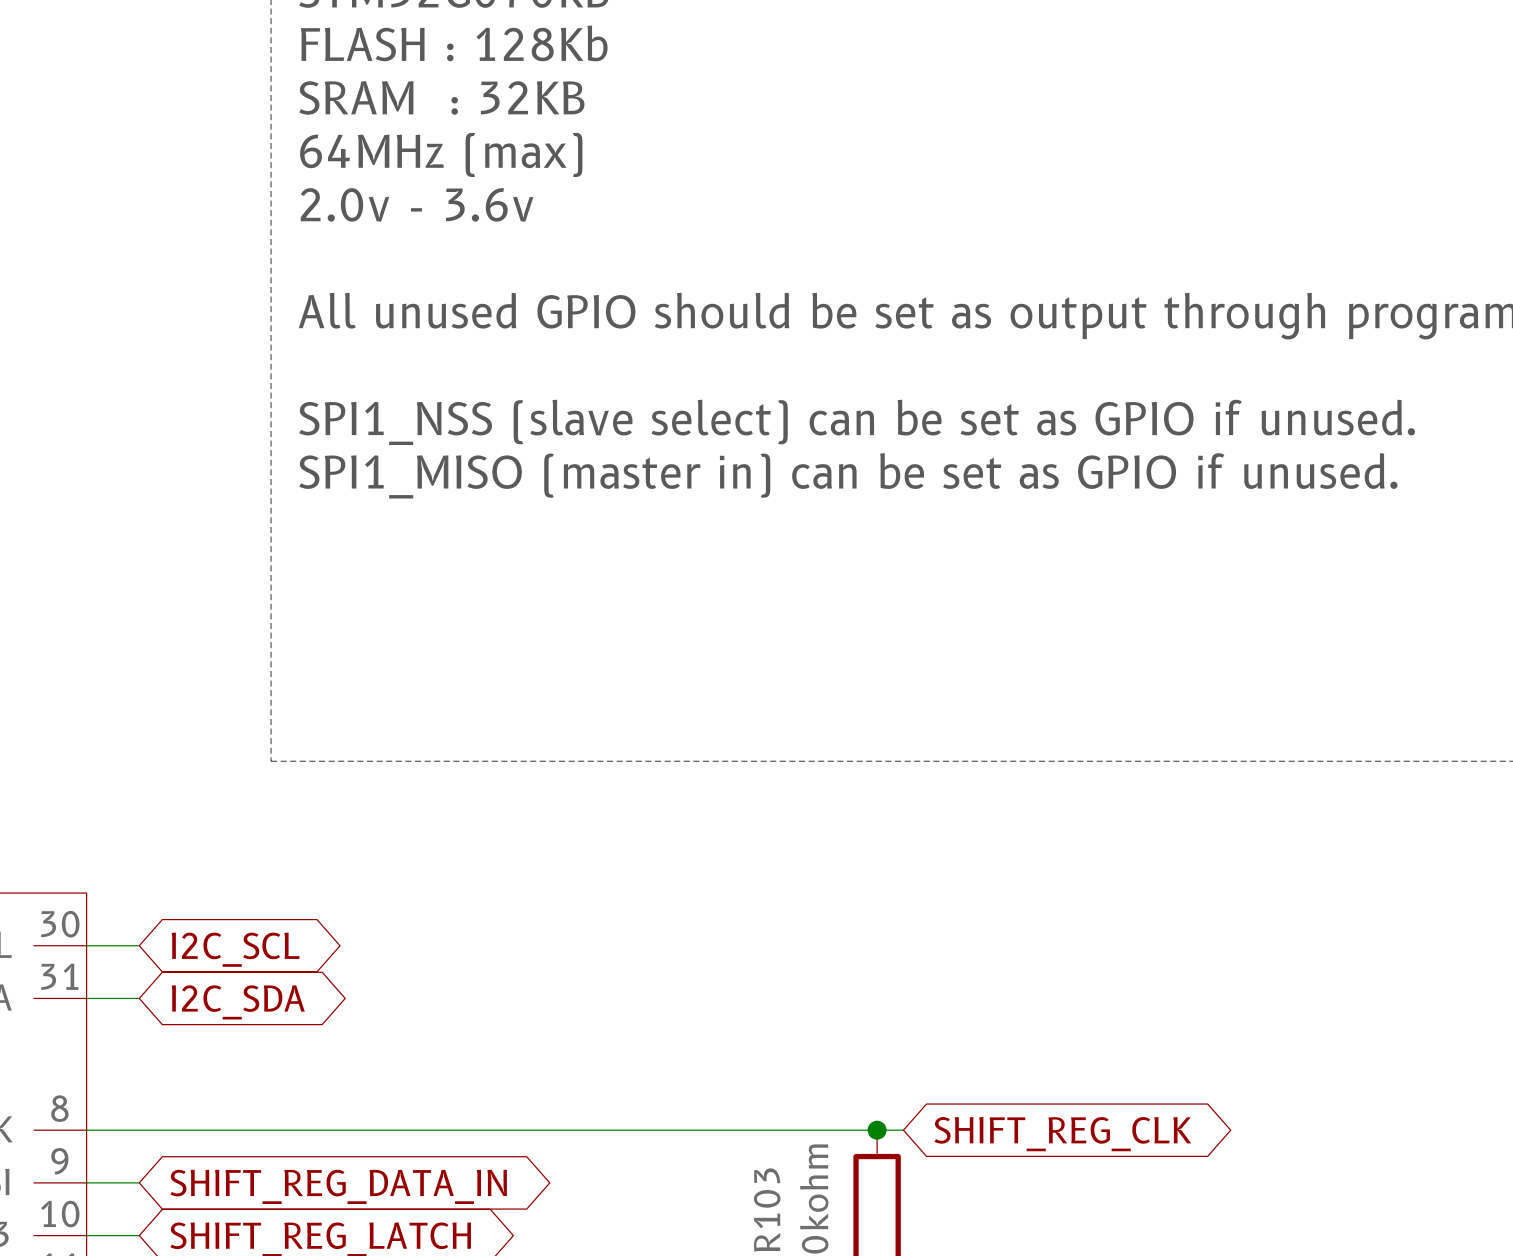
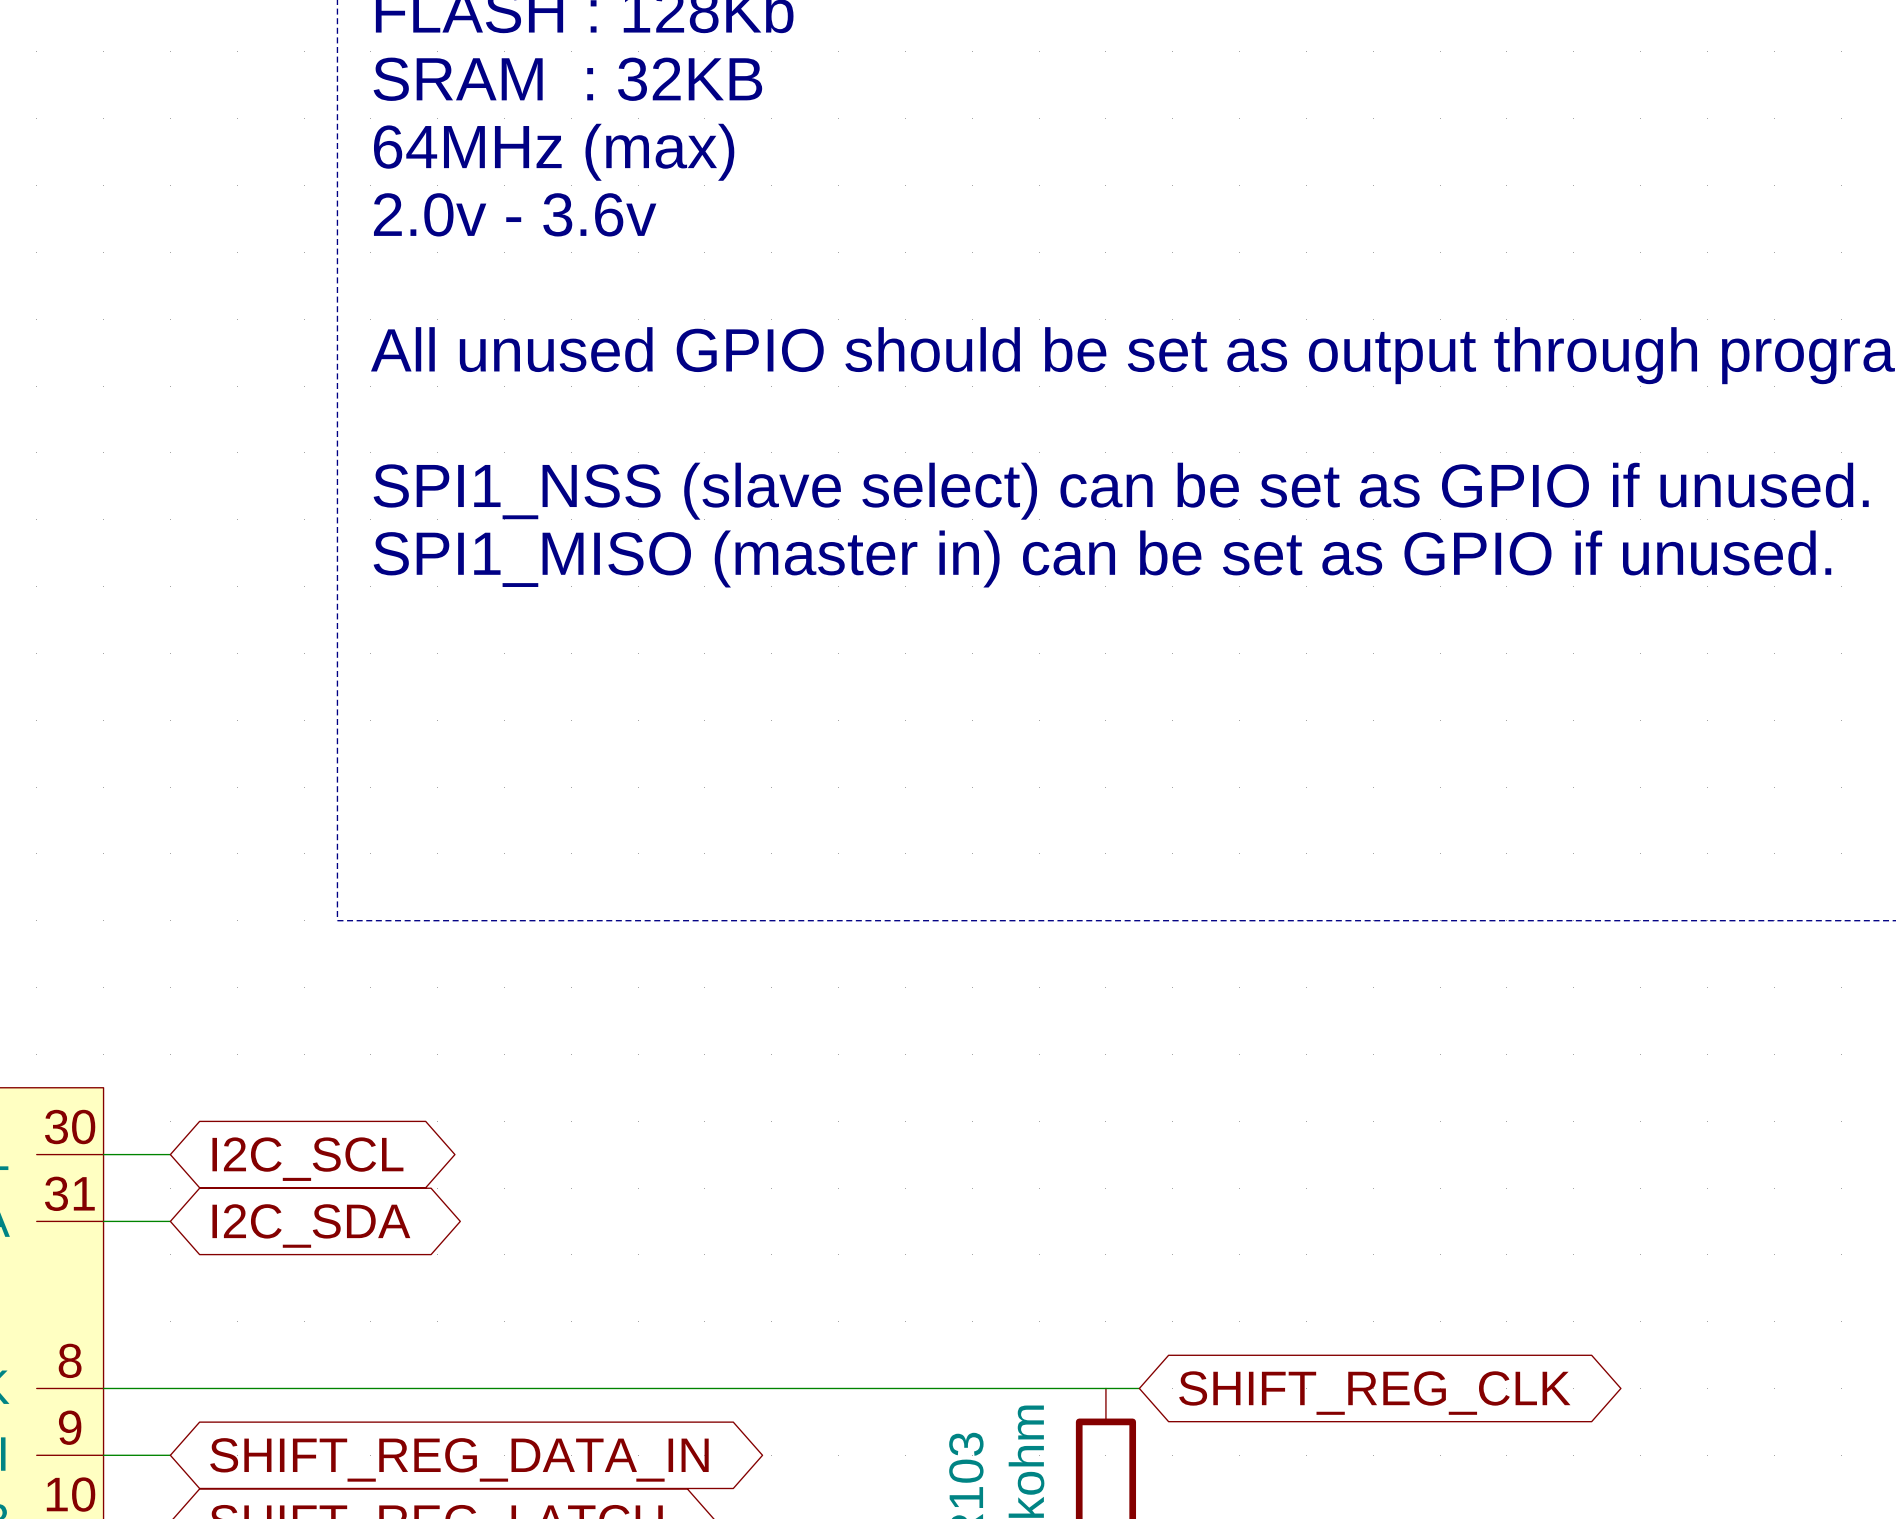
junction: (877, 1130) -> none

